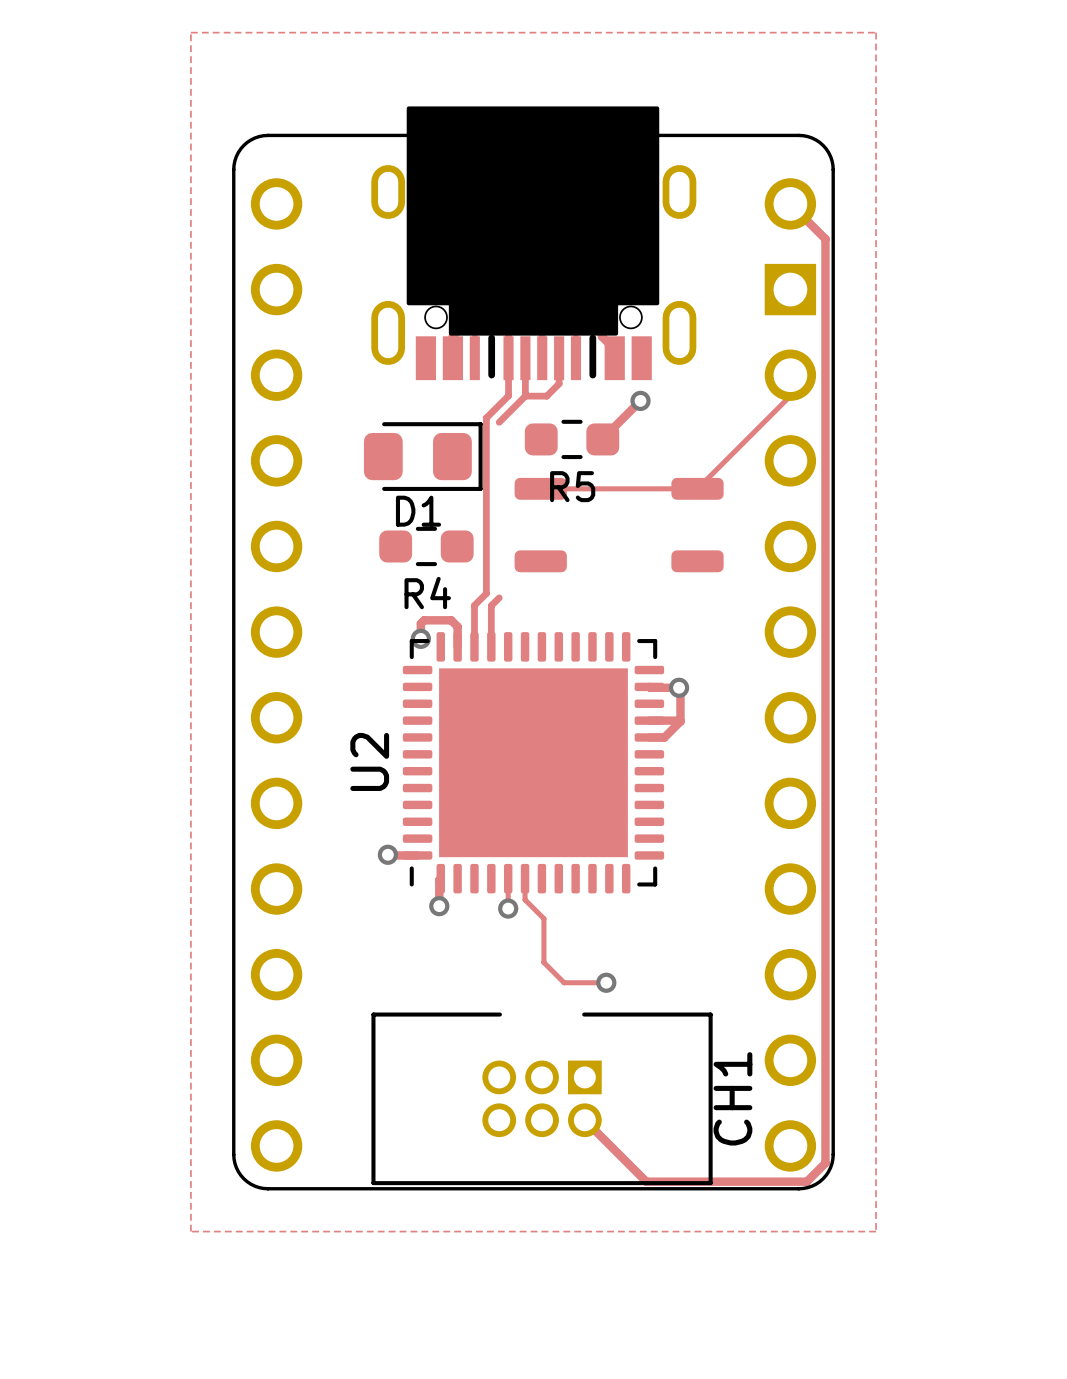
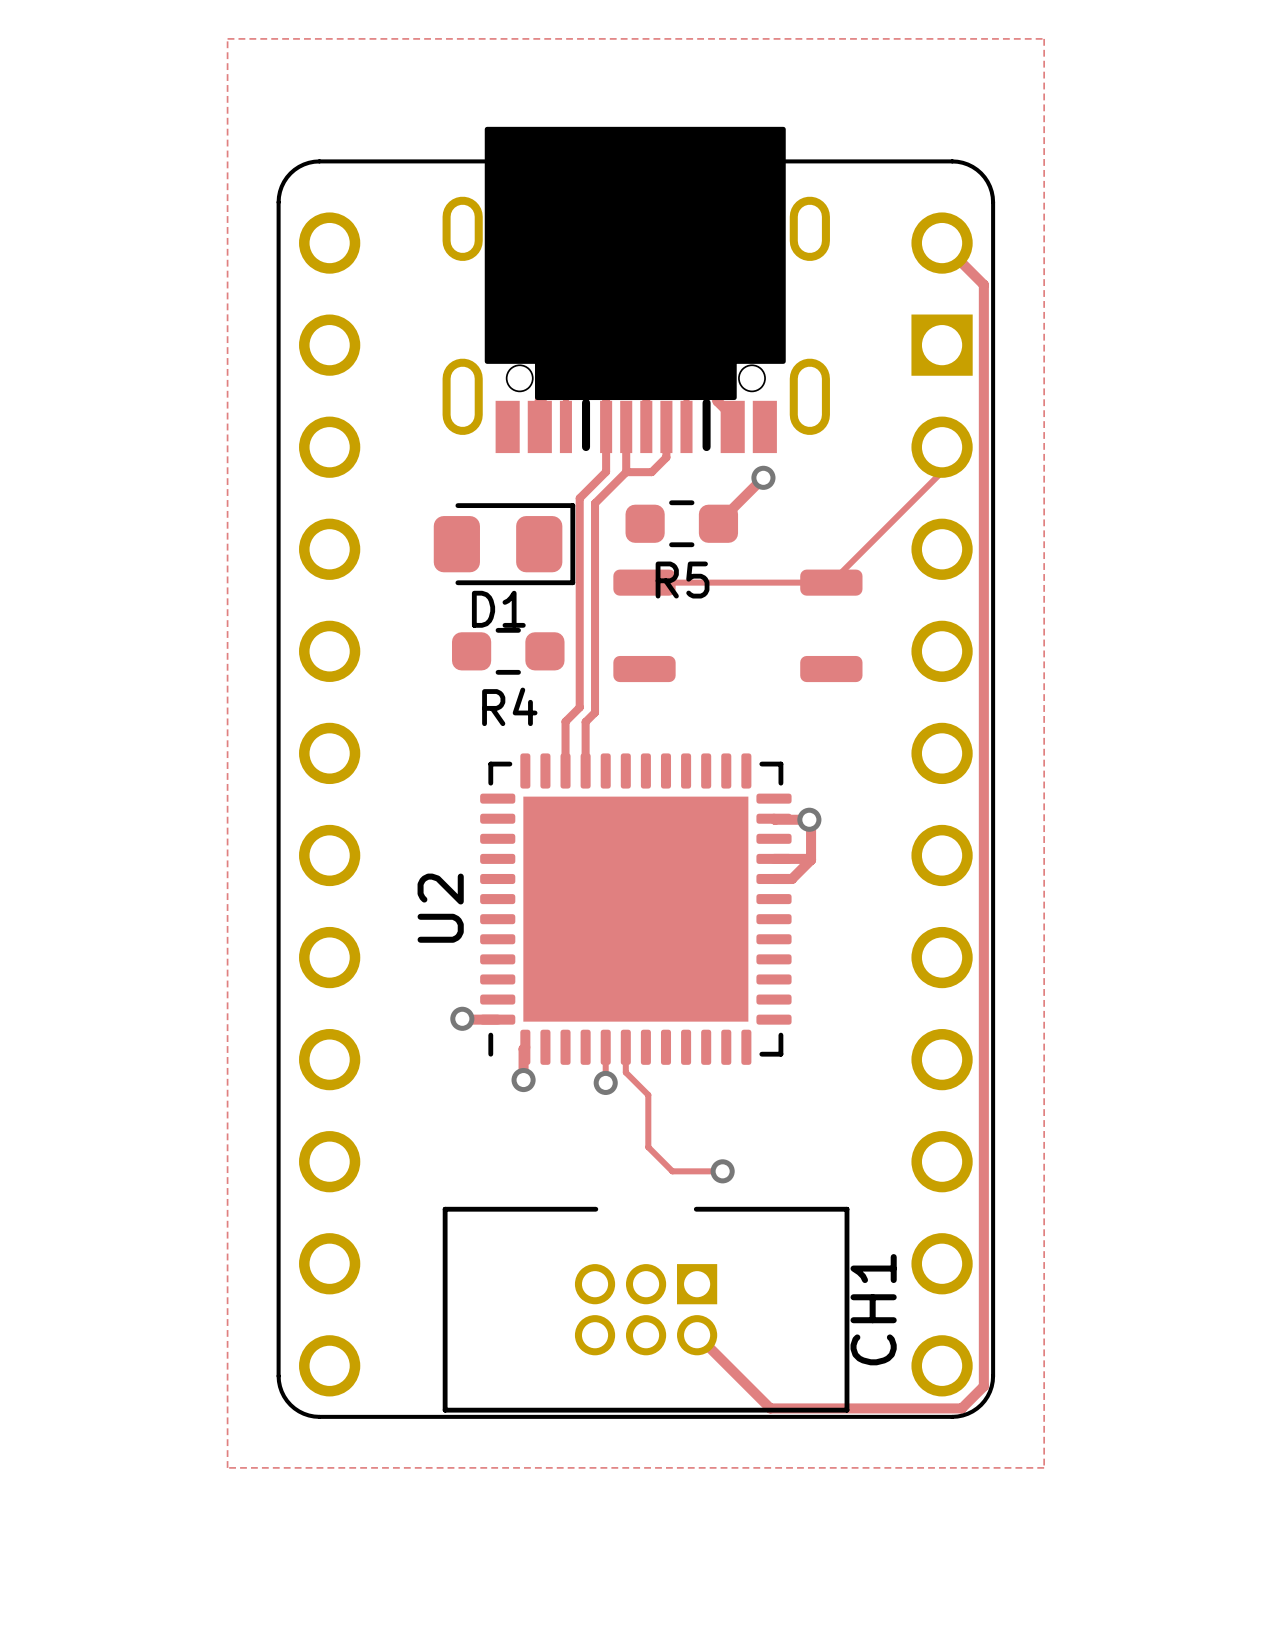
track: none -> (595, 503) (595, 712)
track: (420, 638) (420, 623) (424, 620) (451, 620) (457, 626) (457, 646) -> none
via: (420, 638) -> none

